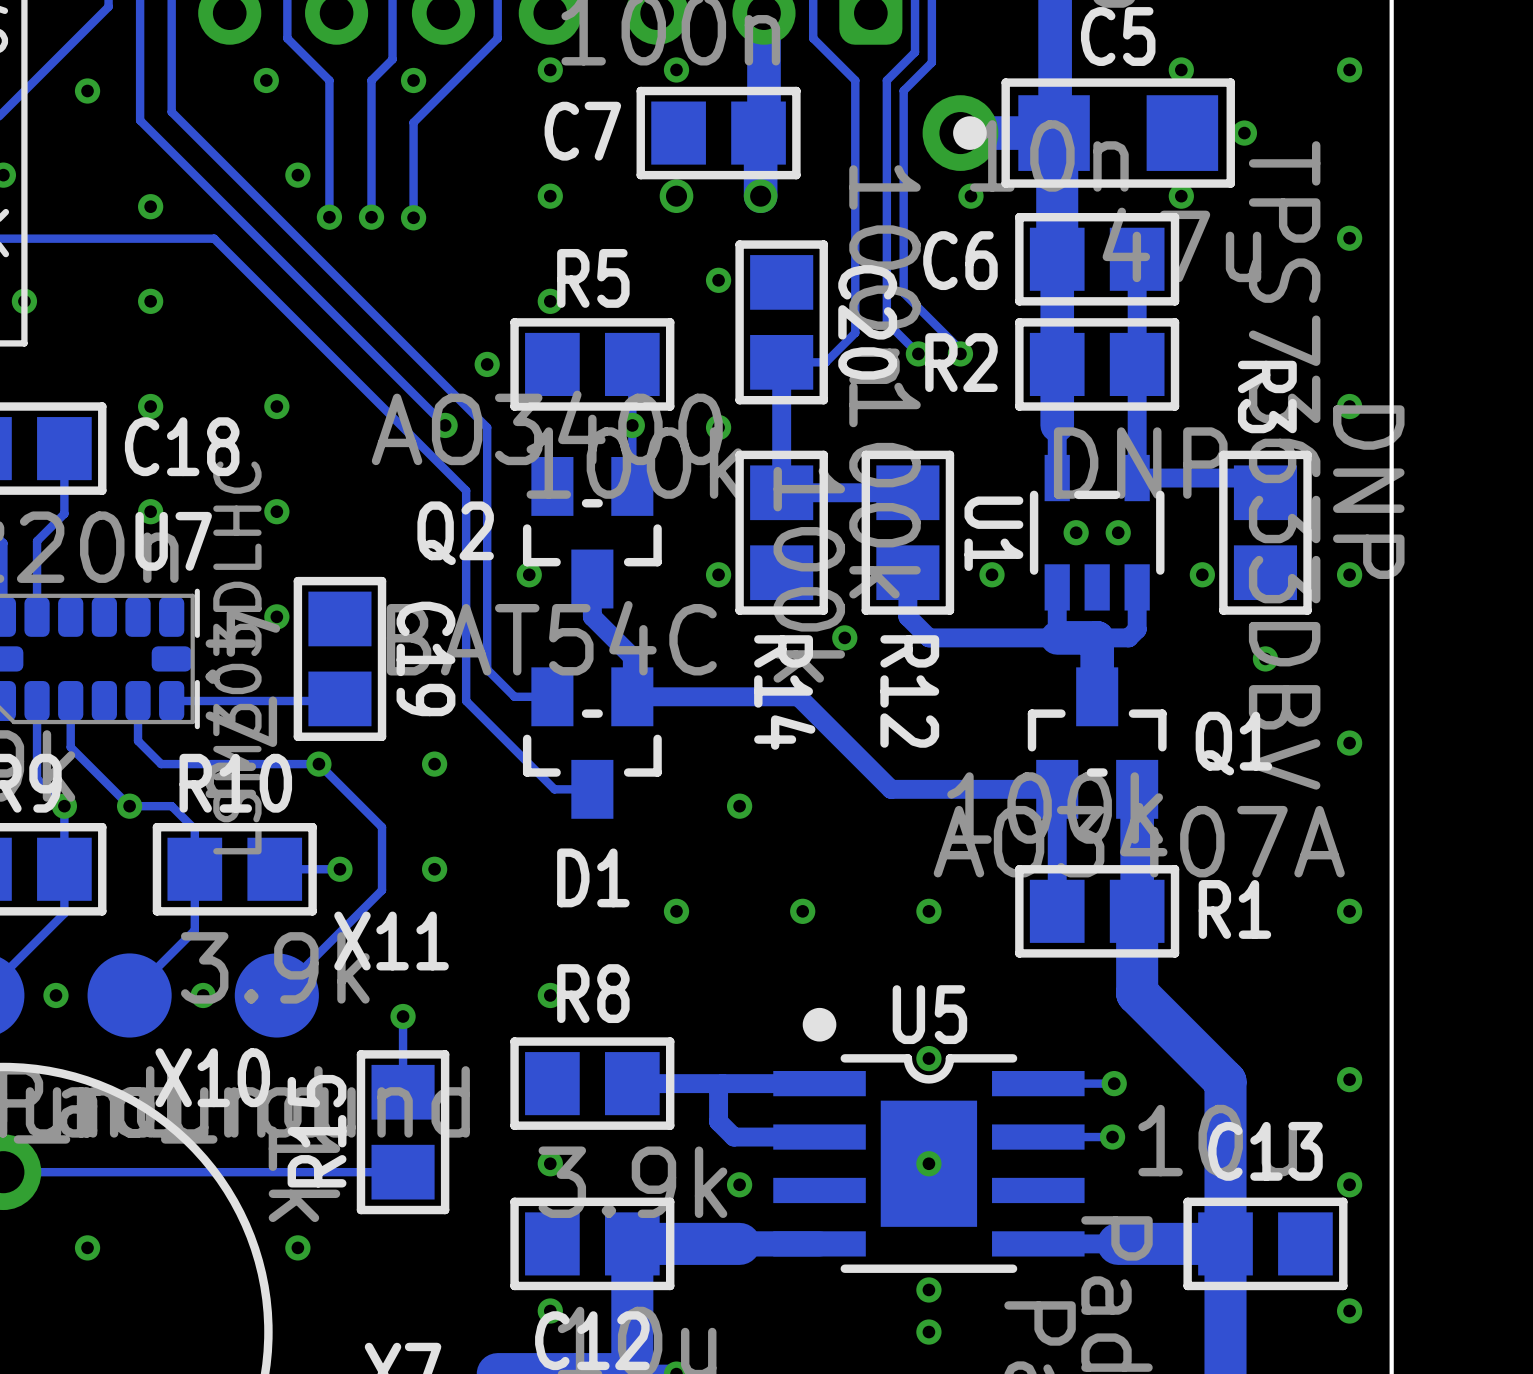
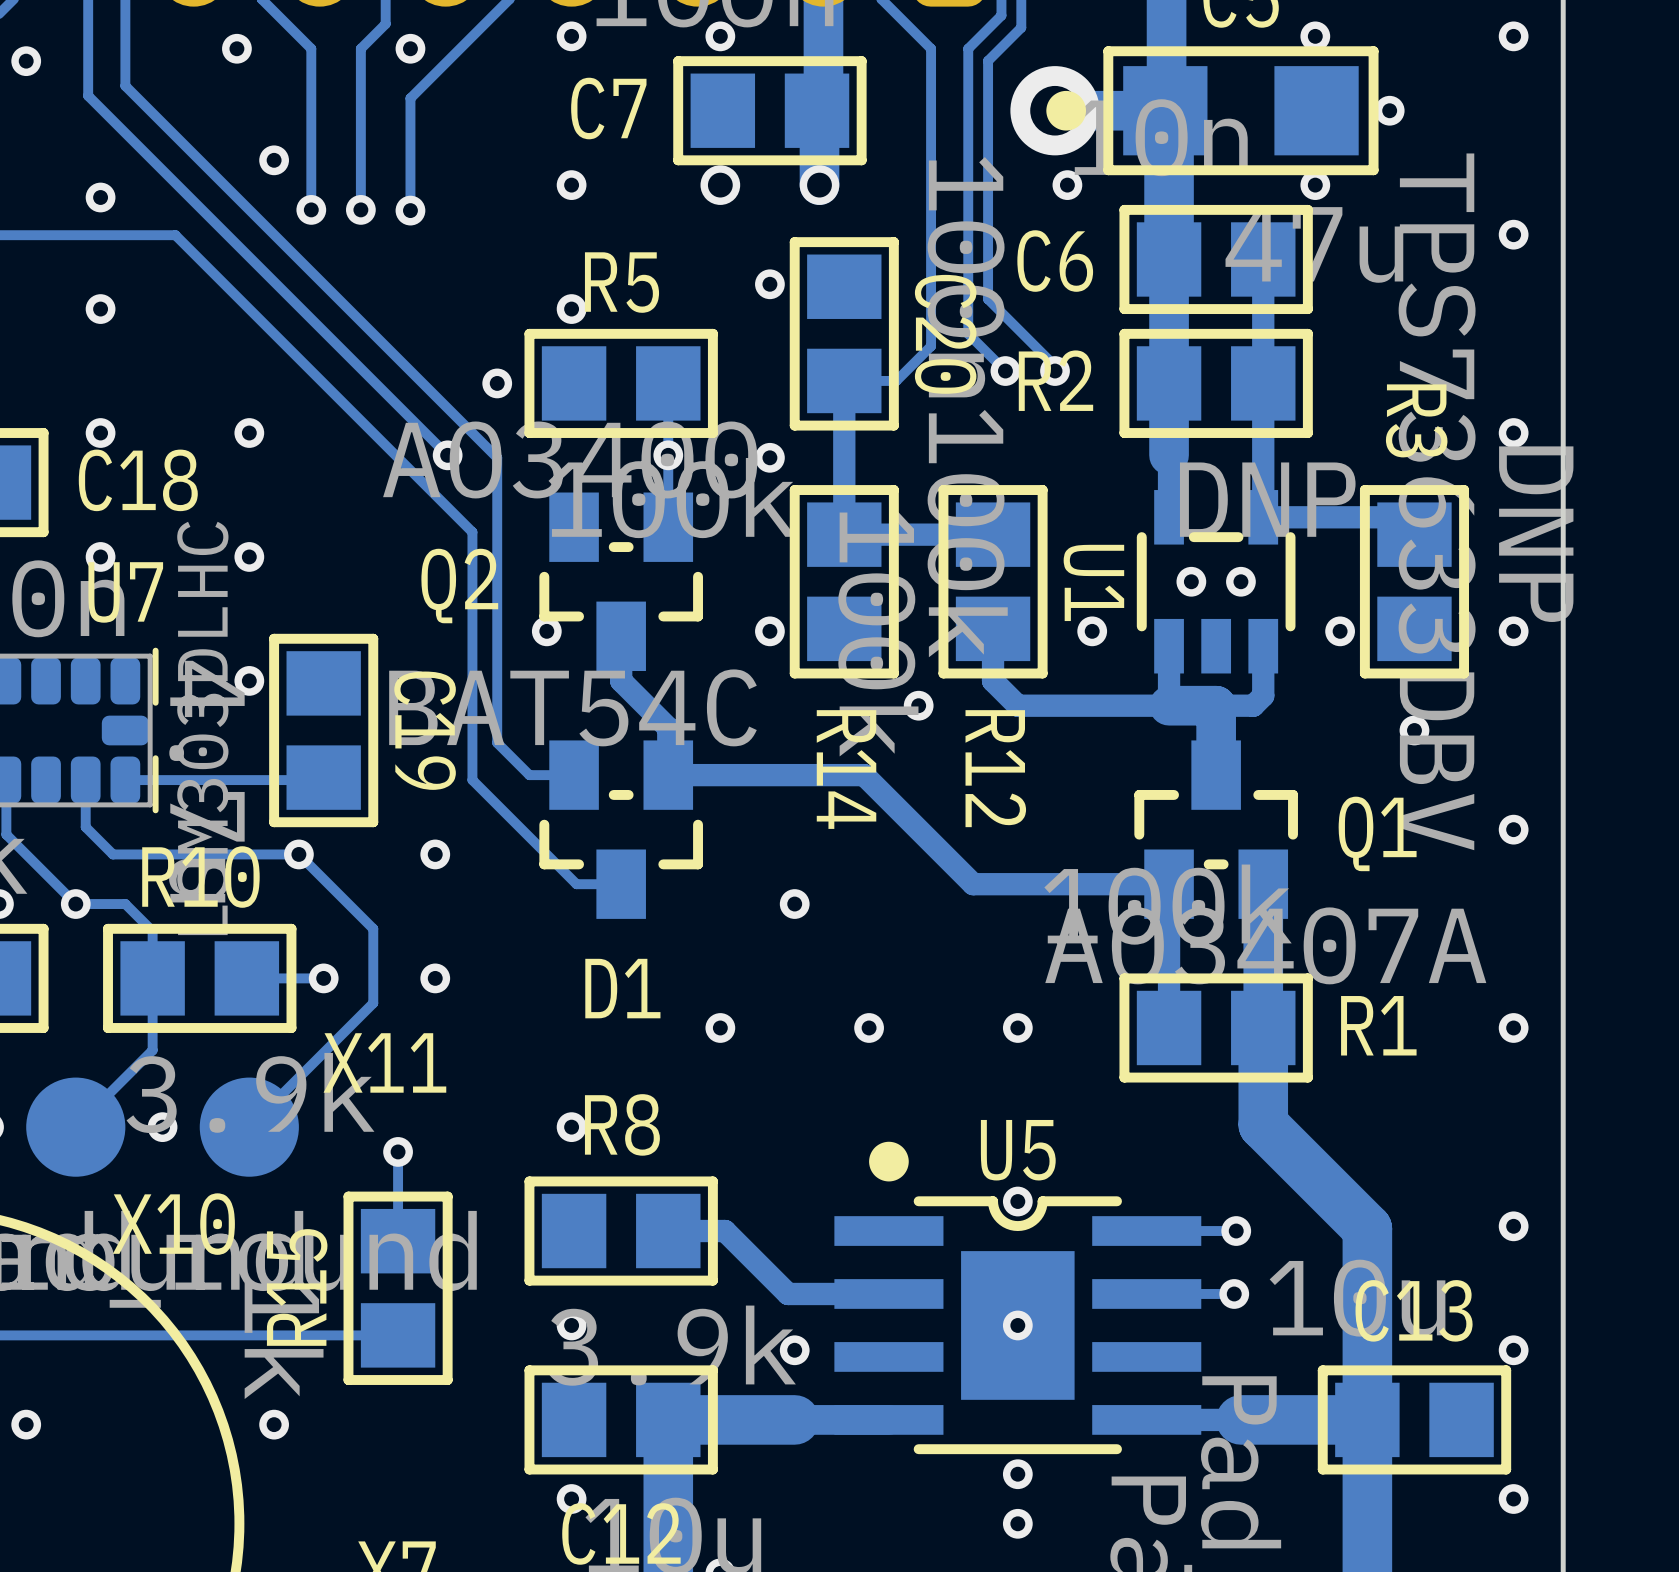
track: (722, 1083) (718, 1087) (718, 1121) -> (725, 1231) (769, 1275)
track: (819, 1083) (680, 1083) -> none

